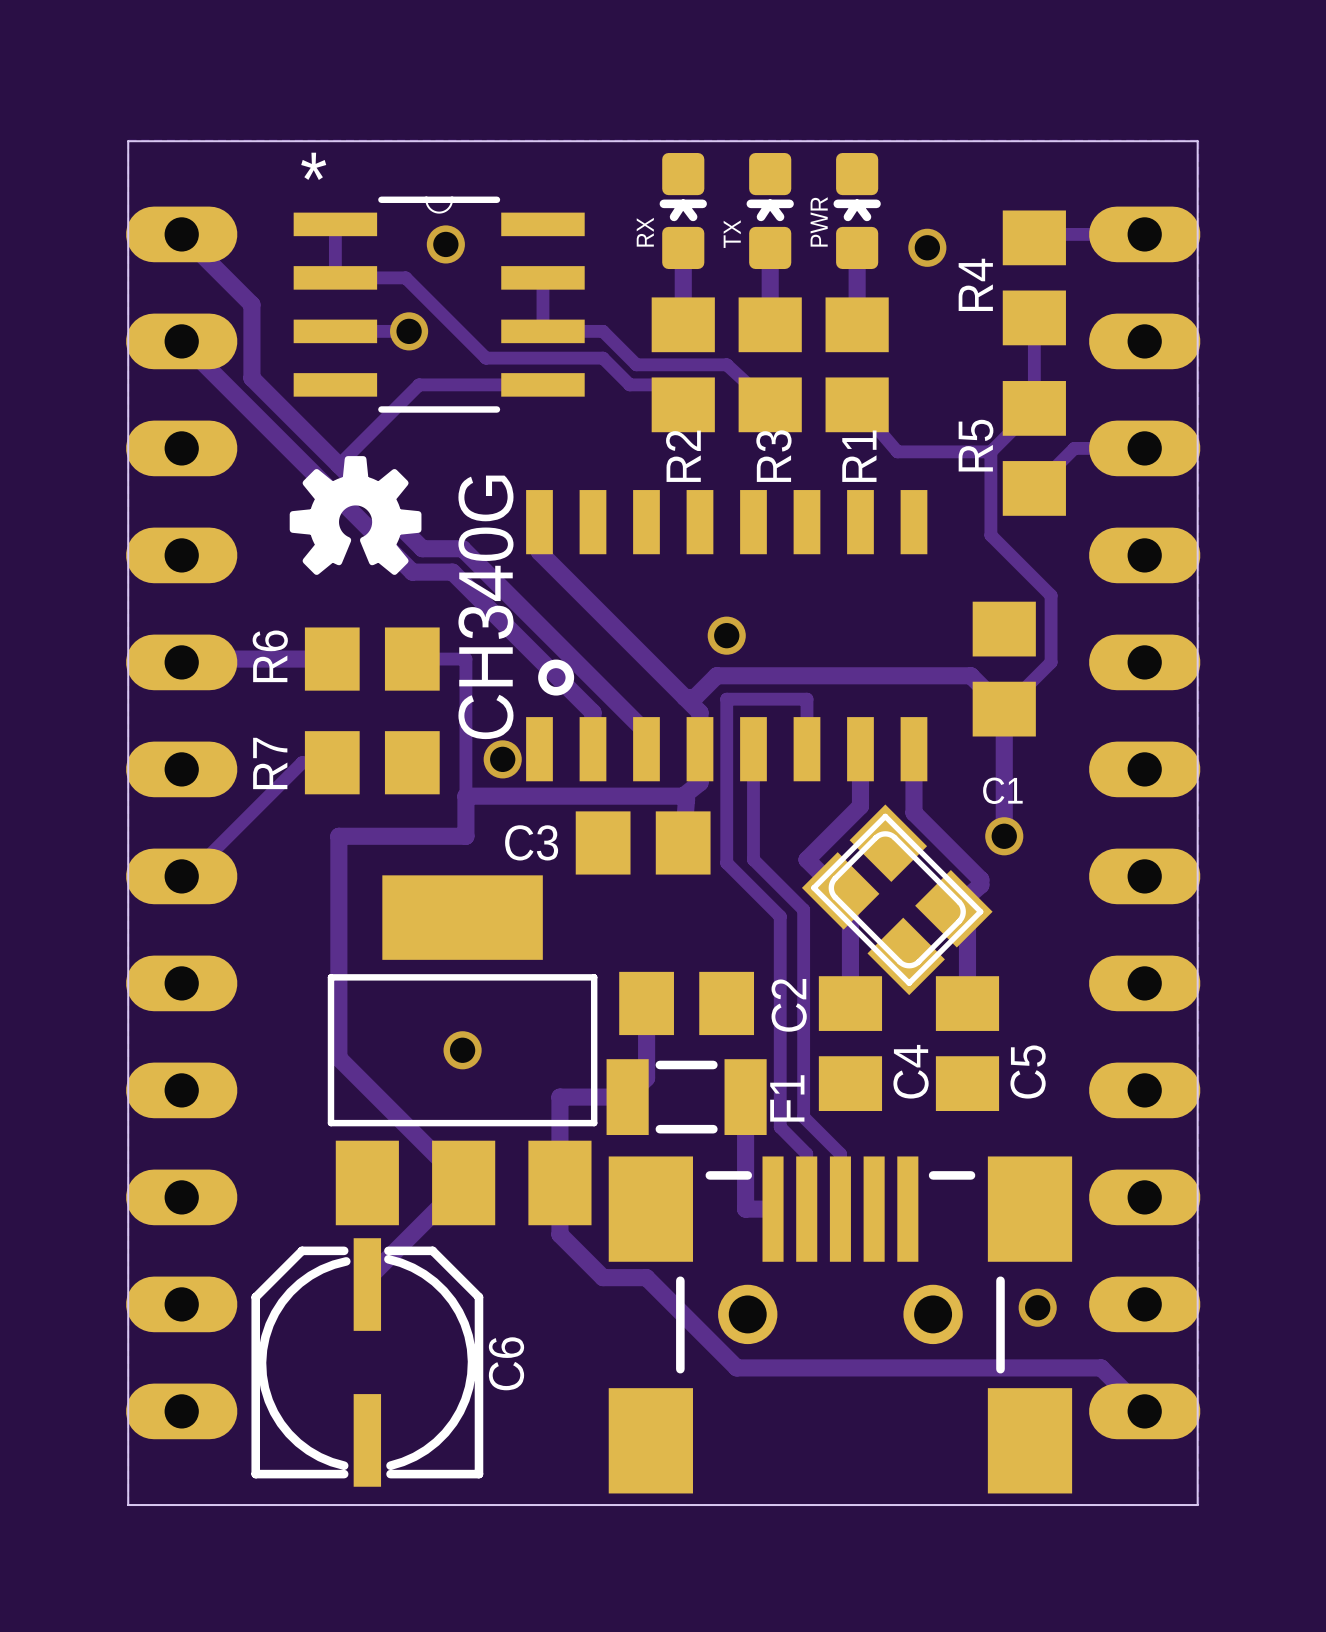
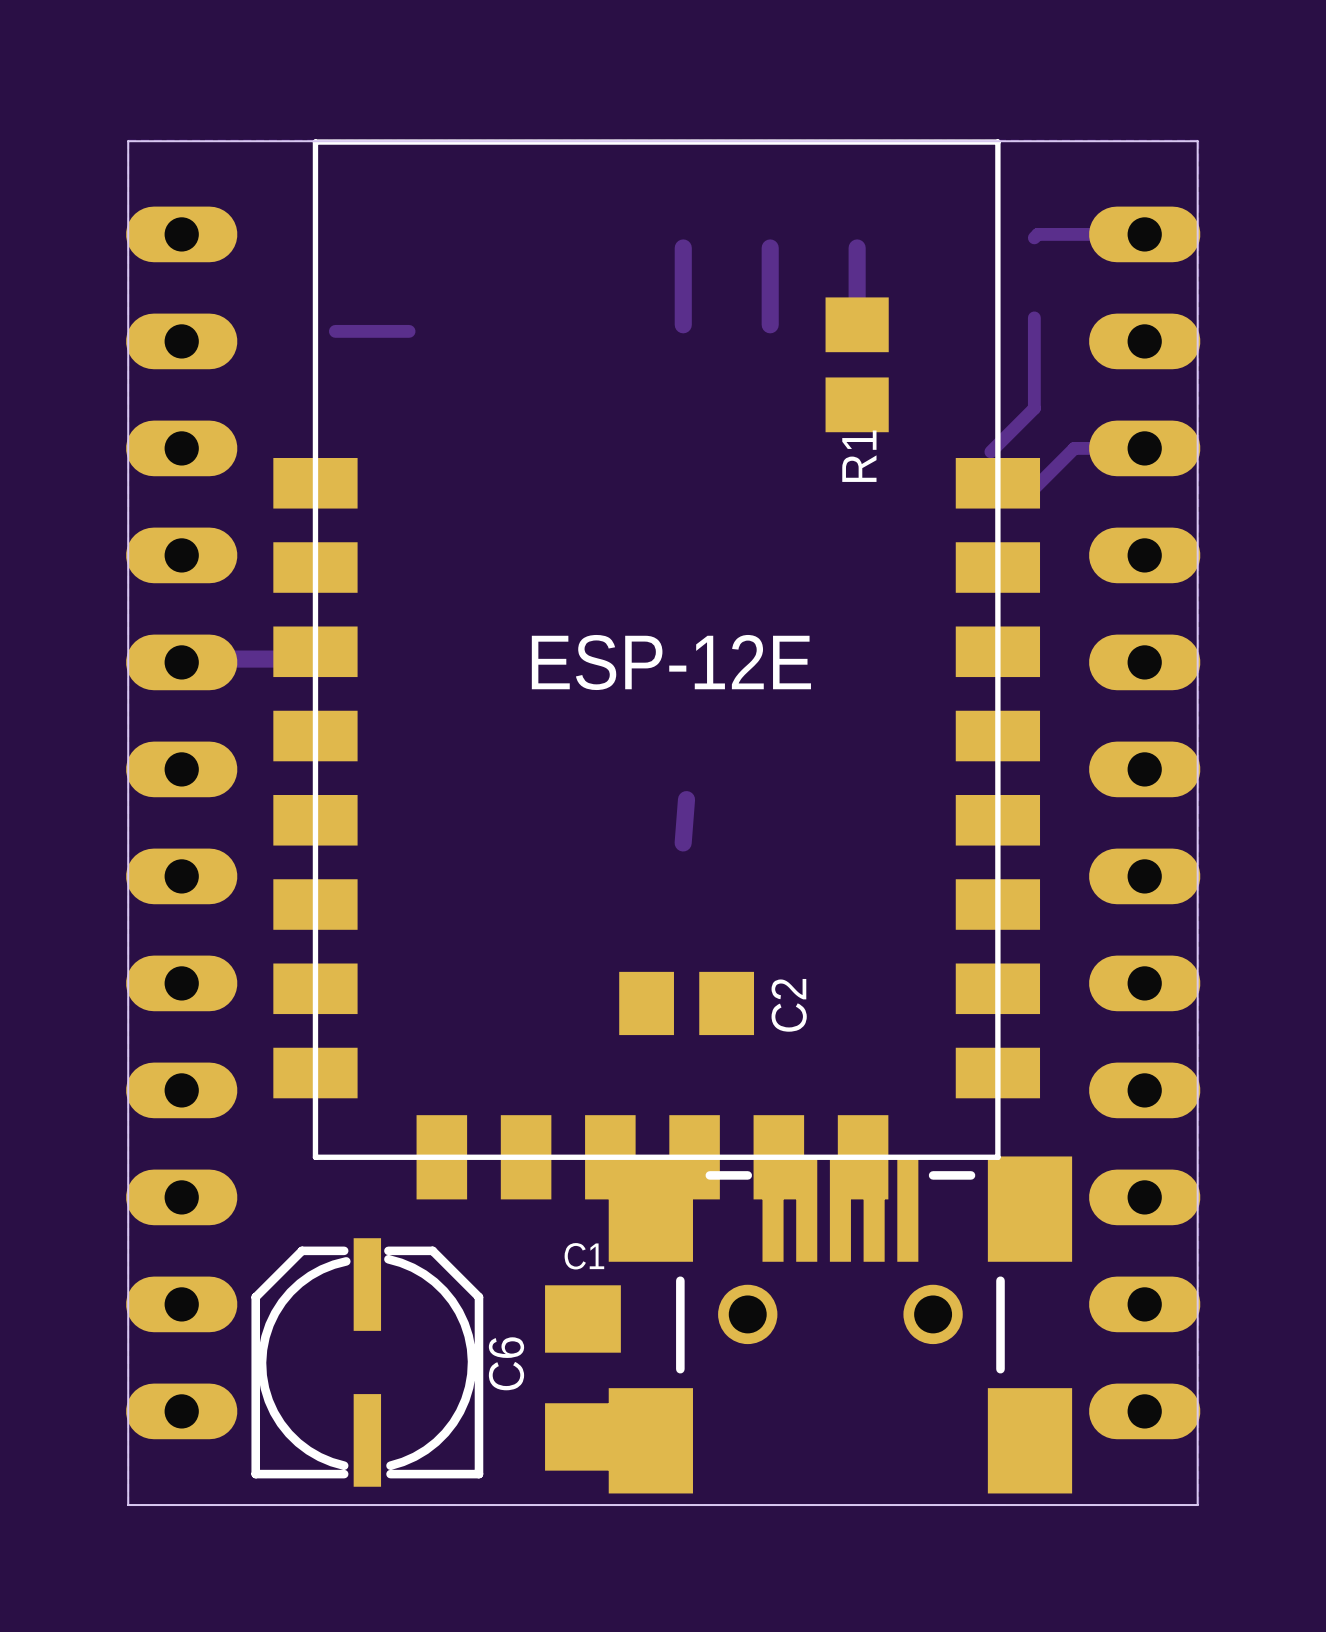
RX: (683, 211) -> none
TX: (770, 211) -> none
PWR: (857, 211) -> none
track: (335, 224) (335, 277) (405, 277) (485, 358) (603, 358) (629, 384) (663, 384) (683, 404) -> none
track: (181, 234) (251, 304) (251, 378) (422, 548) (462, 548) (646, 732) (646, 749) -> none
via: (445, 244) -> none
via: (927, 247) -> none
track: (542, 277) (542, 331) (603, 331) (636, 364) (726, 364) (770, 404) -> none
R4: (1034, 277) -> none
part: (439, 304) -> none
via: (409, 331) -> none
track: (181, 341) (412, 572) (452, 572) (592, 712) (592, 749) -> none
R2: (683, 364) -> none
R3: (770, 364) -> none
track: (542, 384) (419, 384) (338, 465) -> none
track: (857, 404) (897, 451) (990, 451) (990, 535) (1051, 595) (1051, 662) (1004, 709) -> none
R5: (1034, 448) -> none
drawing: [289, 456, 422, 575] -> none
track: (539, 522) (539, 552) (699, 712) (699, 782) (683, 796) -> none
C1 footprint: [972, 601, 1036, 737] -> [545, 1285, 621, 1471]
part: (726, 635) -> none
via: (726, 635) -> none
R6: (372, 659) -> none
track: (412, 659) (465, 659) (465, 796) -> none
part: none -> (656, 669)
track: (684, 697) (694, 697) (716, 675) (970, 675) (1004, 709) -> none
track: (1004, 709) (1004, 836) -> none
track: (753, 749) (753, 859) (803, 909) (803, 1117) (840, 1153) (840, 1209) -> none
track: (806, 749) (806, 699) (726, 699) (726, 863) (780, 916) (780, 1127) (806, 1153) (806, 1209) -> none
track: (860, 749) (860, 806) (806, 859) (840, 893) (840, 890) (850, 904) (850, 1003) -> none
track: (913, 749) (913, 812) (980, 879) (980, 885) (953, 908) (967, 925) (967, 1003) -> none
via: (502, 759) -> none
track: (332, 762) (302, 762) (200, 864) (193, 864) (181, 876) -> none
R7: (372, 762) -> none
C1 name position: C1 (1002, 790) -> C1 (584, 1256)
track: (465, 796) (683, 796) -> none
track: (465, 796) (465, 836) (338, 836) (338, 1058) (463, 1182) (367, 1279) (367, 1284) -> none
via: (1004, 836) -> none
C3: (643, 842) -> none
part: (897, 899) -> none
track: (646, 1003) (646, 1078) (627, 1097) (559, 1097) (559, 1234) (603, 1277) (646, 1277) (736, 1367) (1101, 1367) (1144, 1411) -> none
C4: (850, 1043) -> none
C5: (967, 1043) -> none
part: (462, 1050) -> none
via: (462, 1050) -> none
F1: (686, 1097) -> none
track: (745, 1097) (745, 1209) (773, 1209) -> none
via: (1037, 1307) -> none

